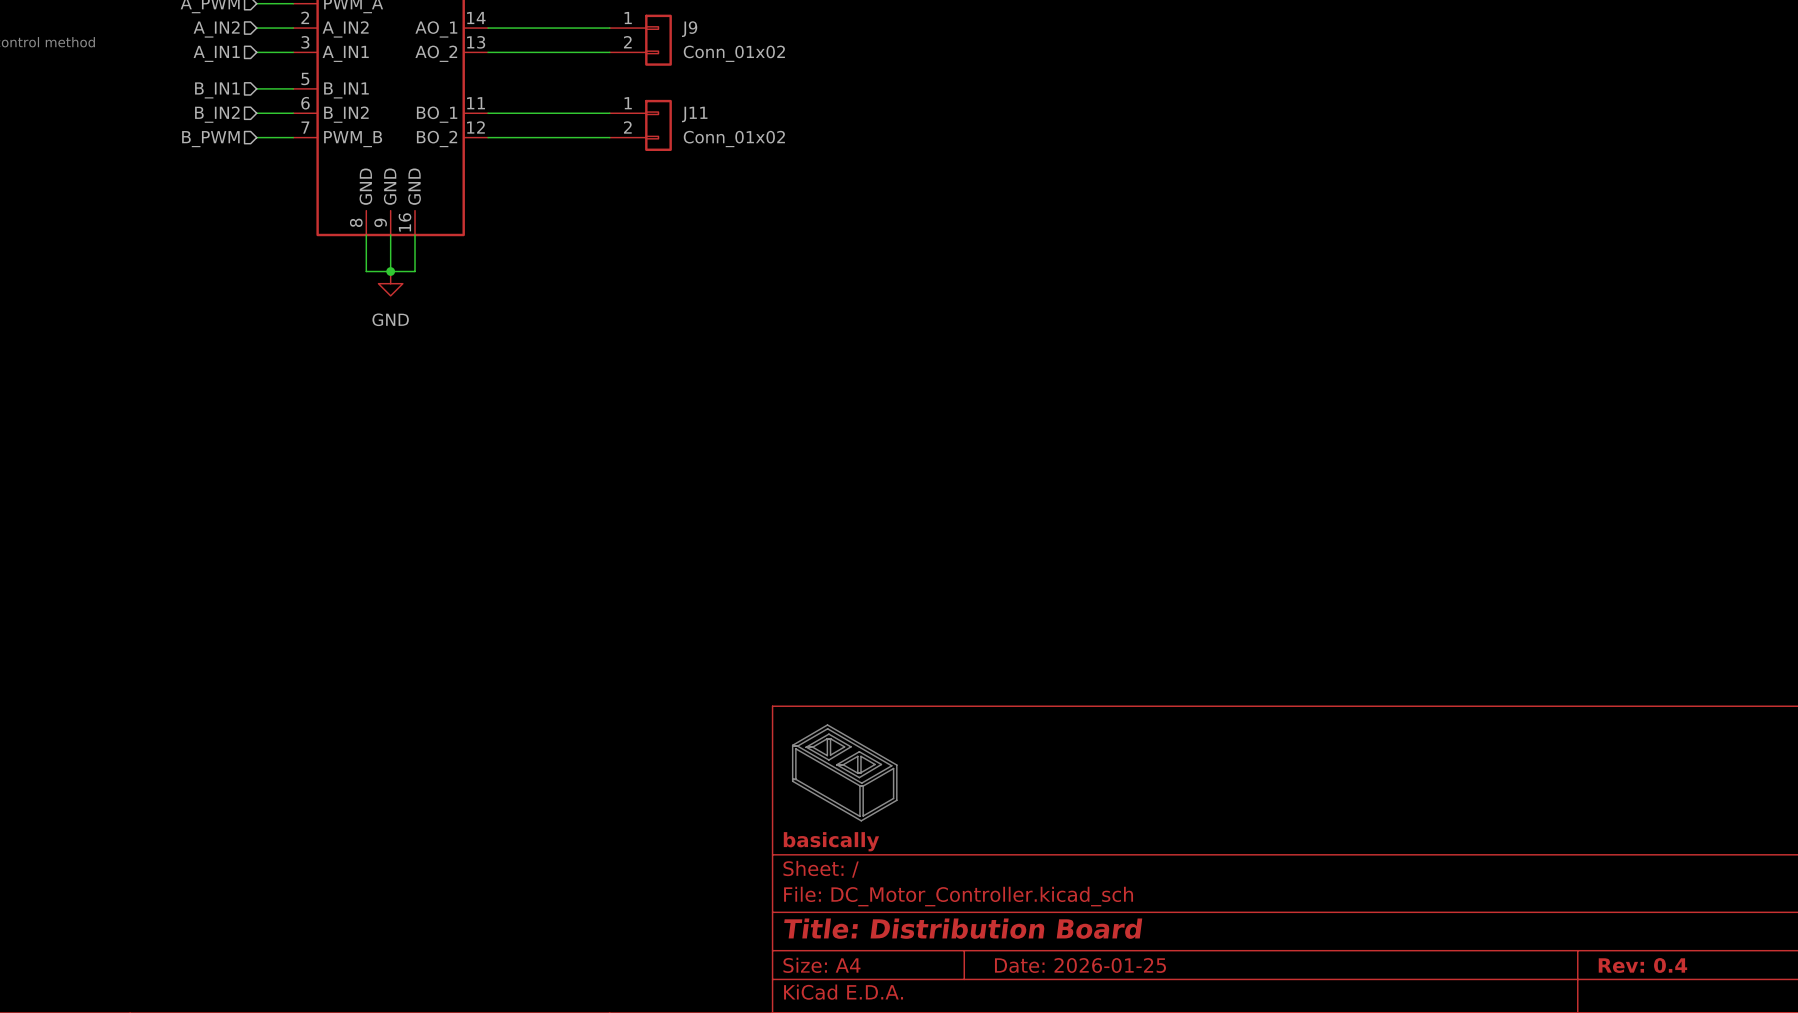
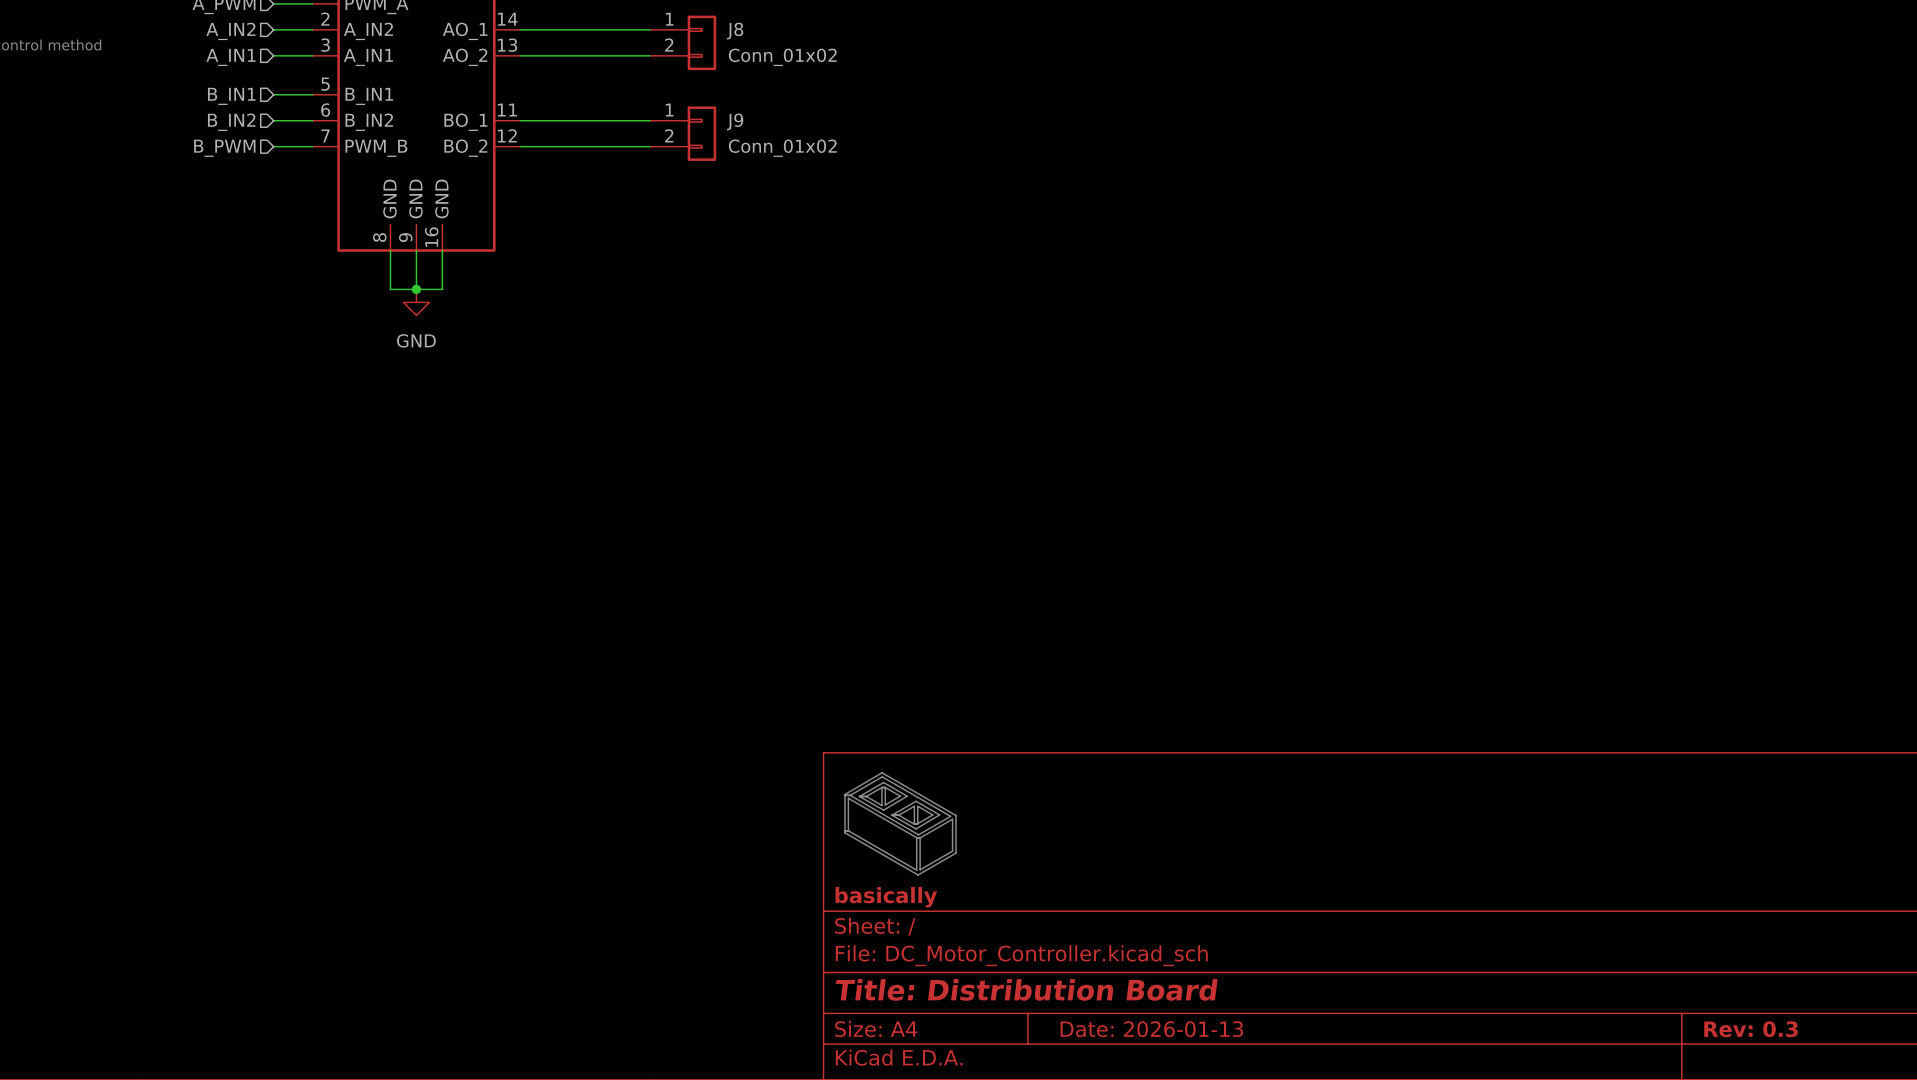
J9 name: J9 (689, 29) -> J8 (735, 31)
J11 name: J11 (694, 114) -> J9 (735, 121)
title block: Date: 2026-01-25 (1080, 965) -> Date: 2026-01-13 (1151, 1029)
title block: Rev: 0.4 (1642, 965) -> Rev: 0.3 (1751, 1029)

